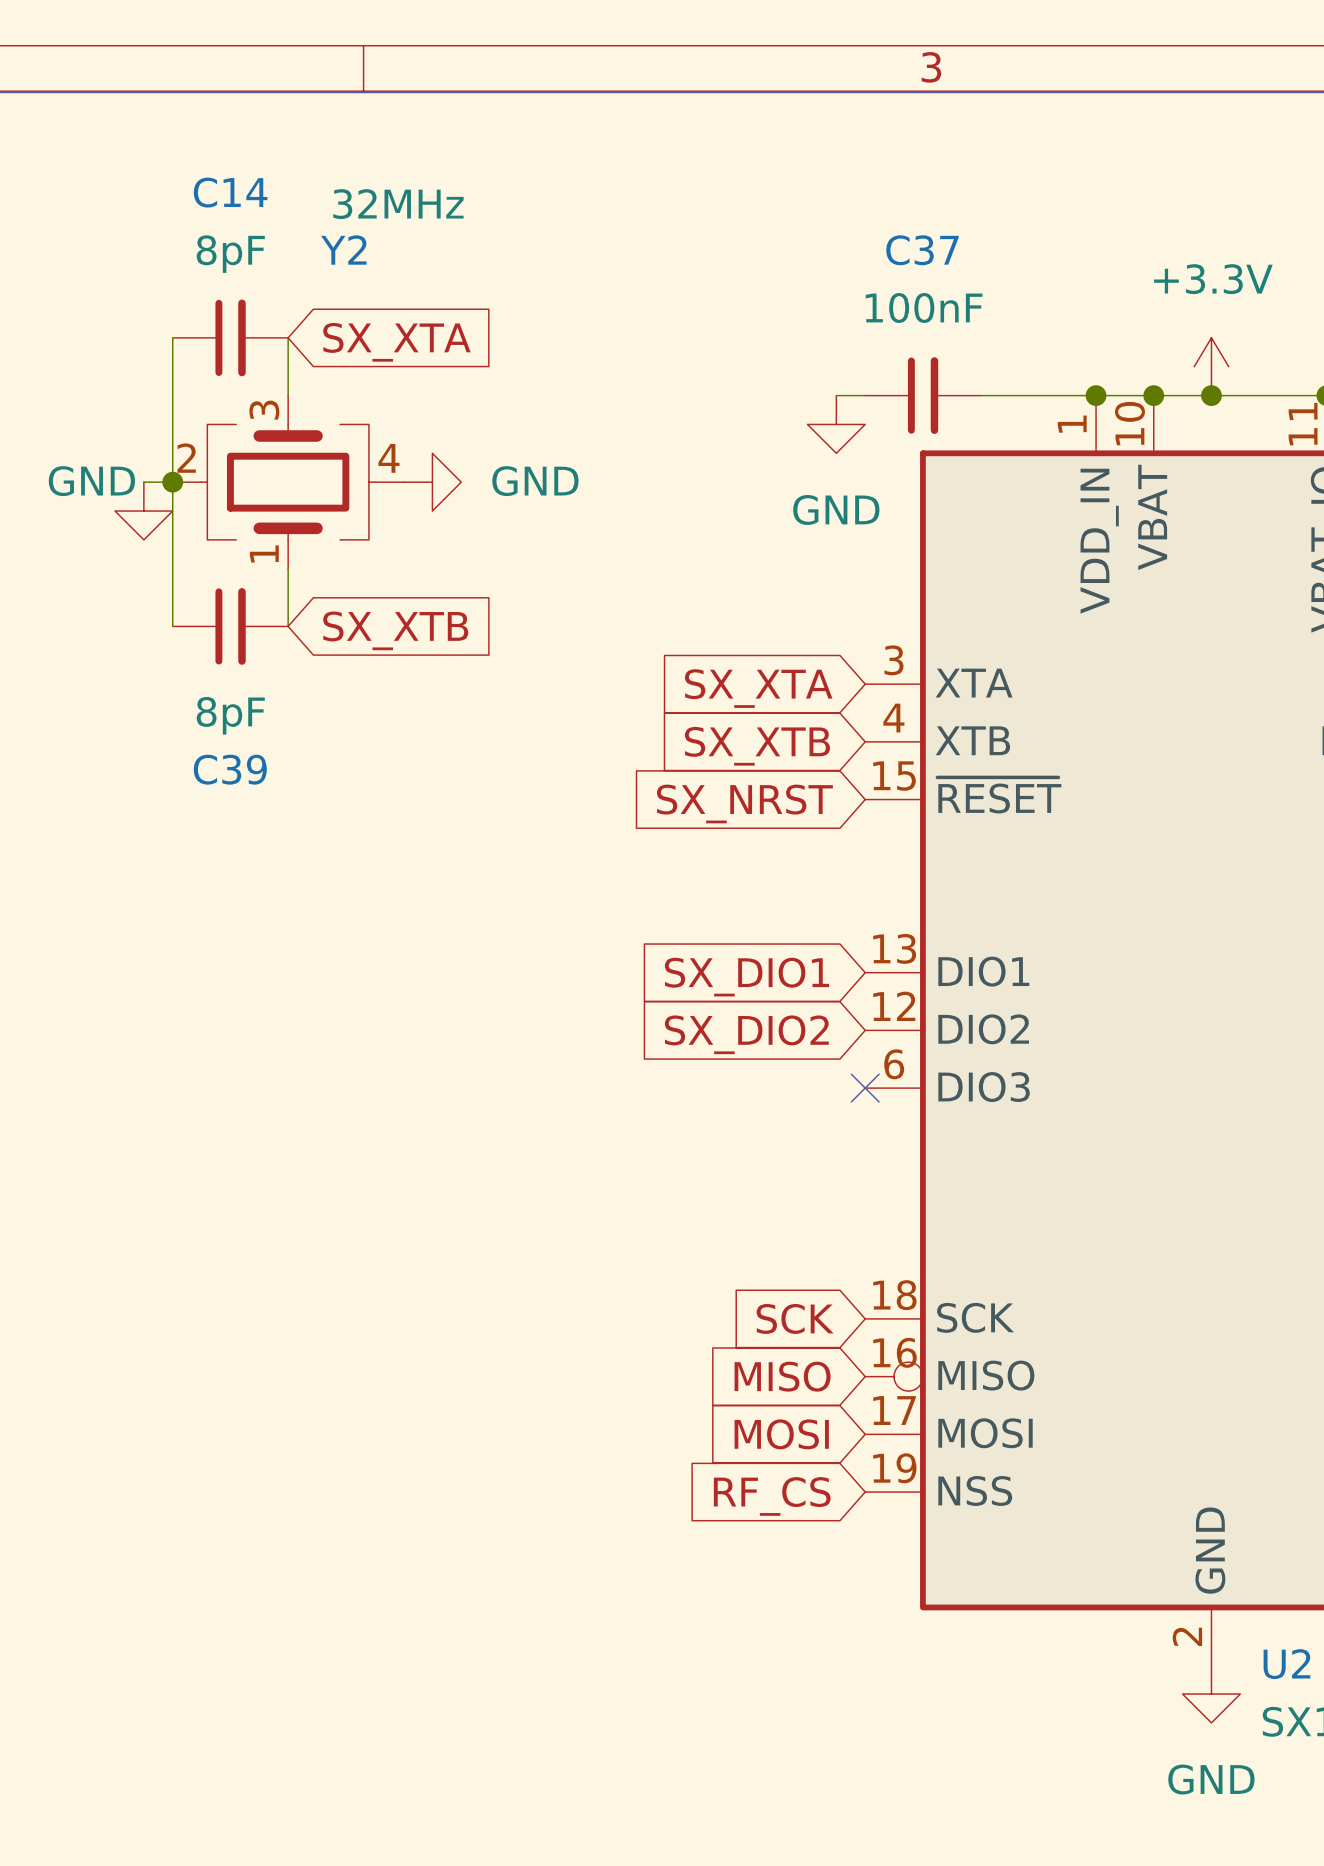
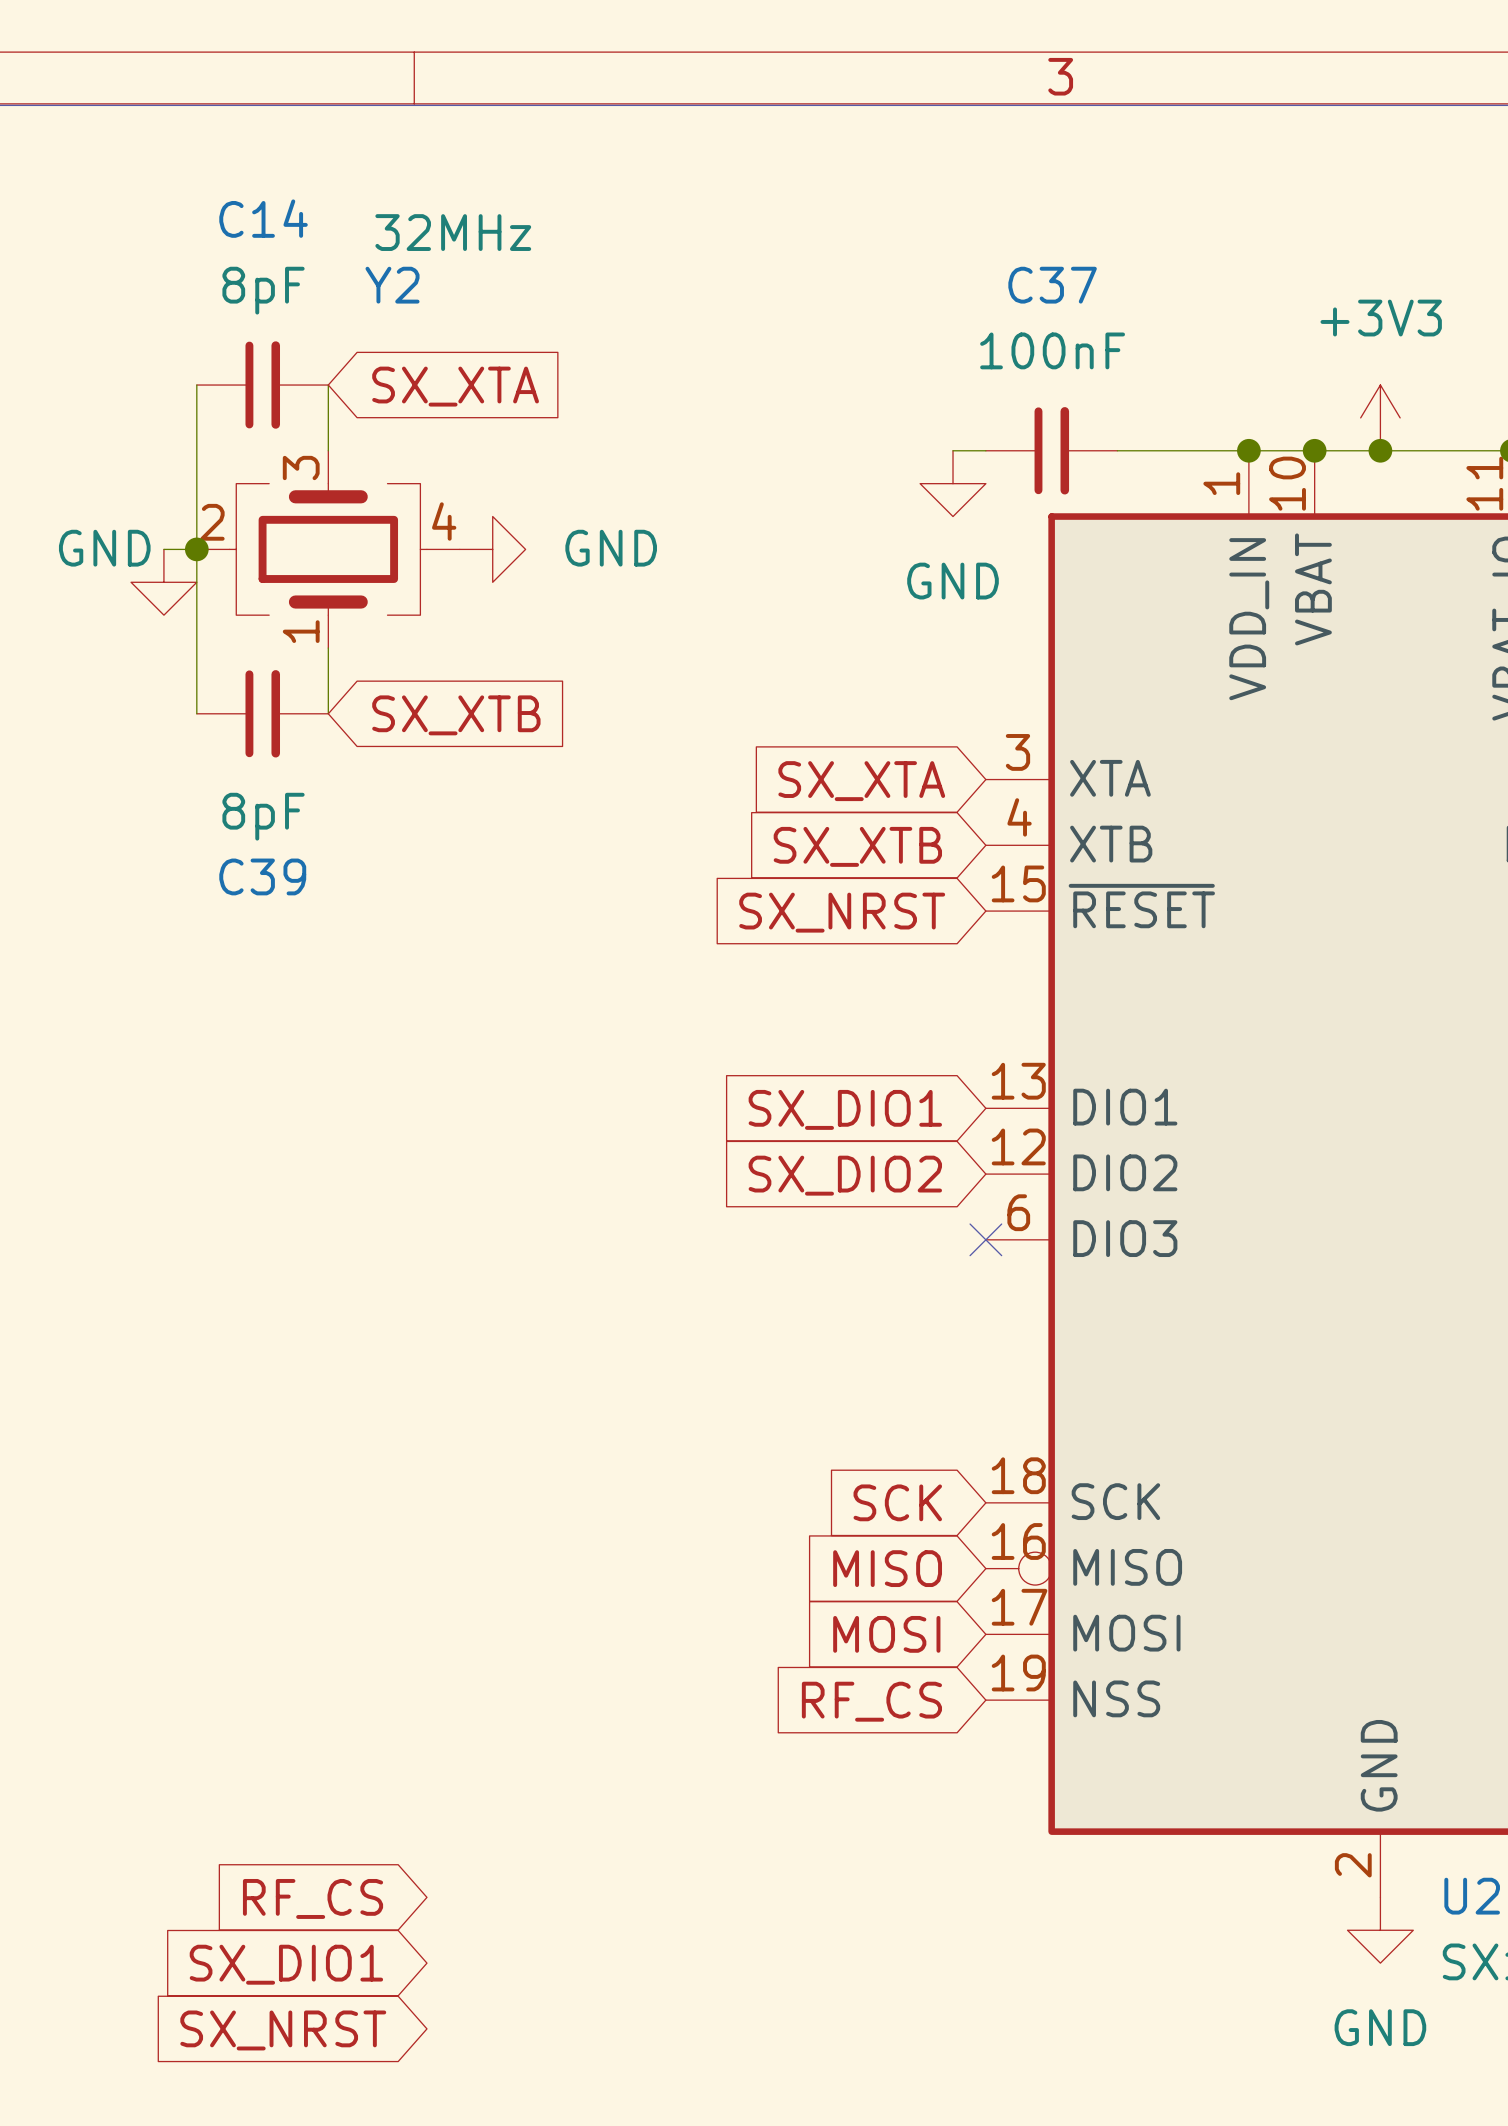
power symbol: +3.3V (1211, 366) -> +3V3 (1380, 417)
global label: none -> RF_CS (313, 1898)
global label: none -> SX_DIO1 (286, 1964)
global label: none -> SX_NRST (283, 2030)

